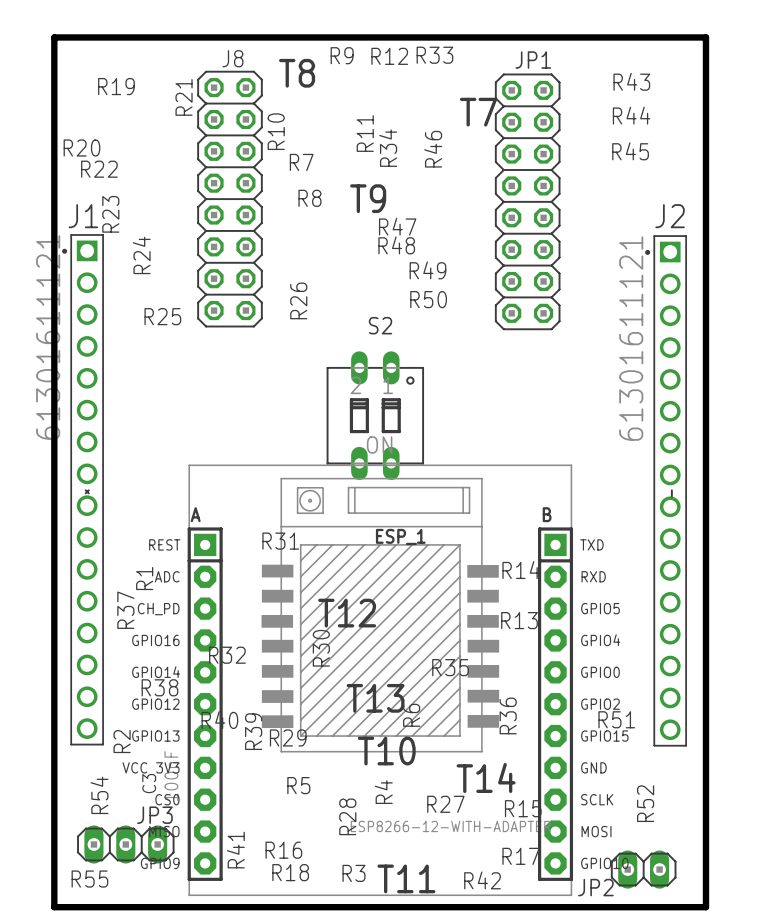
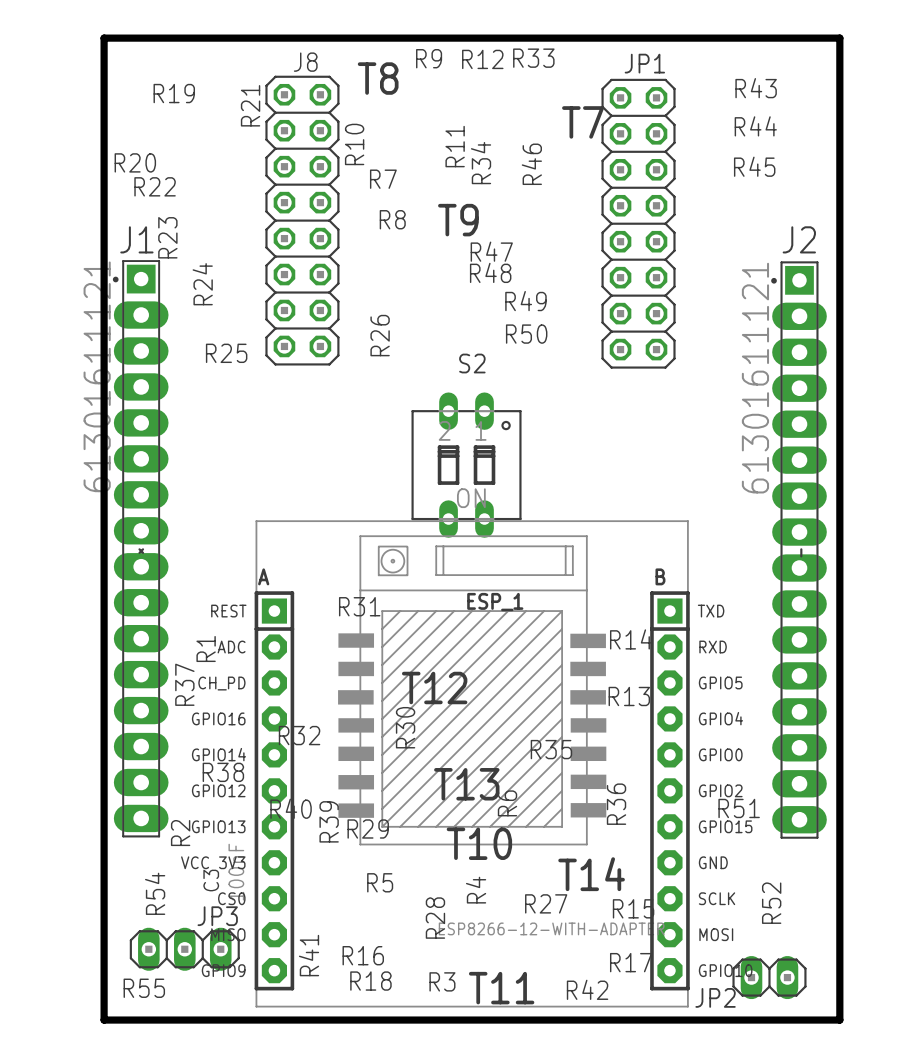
J1 footprint: [62, 234, 104, 746] -> [112, 260, 169, 838]
J2 footprint: [645, 235, 687, 747] -> [771, 261, 827, 839]

